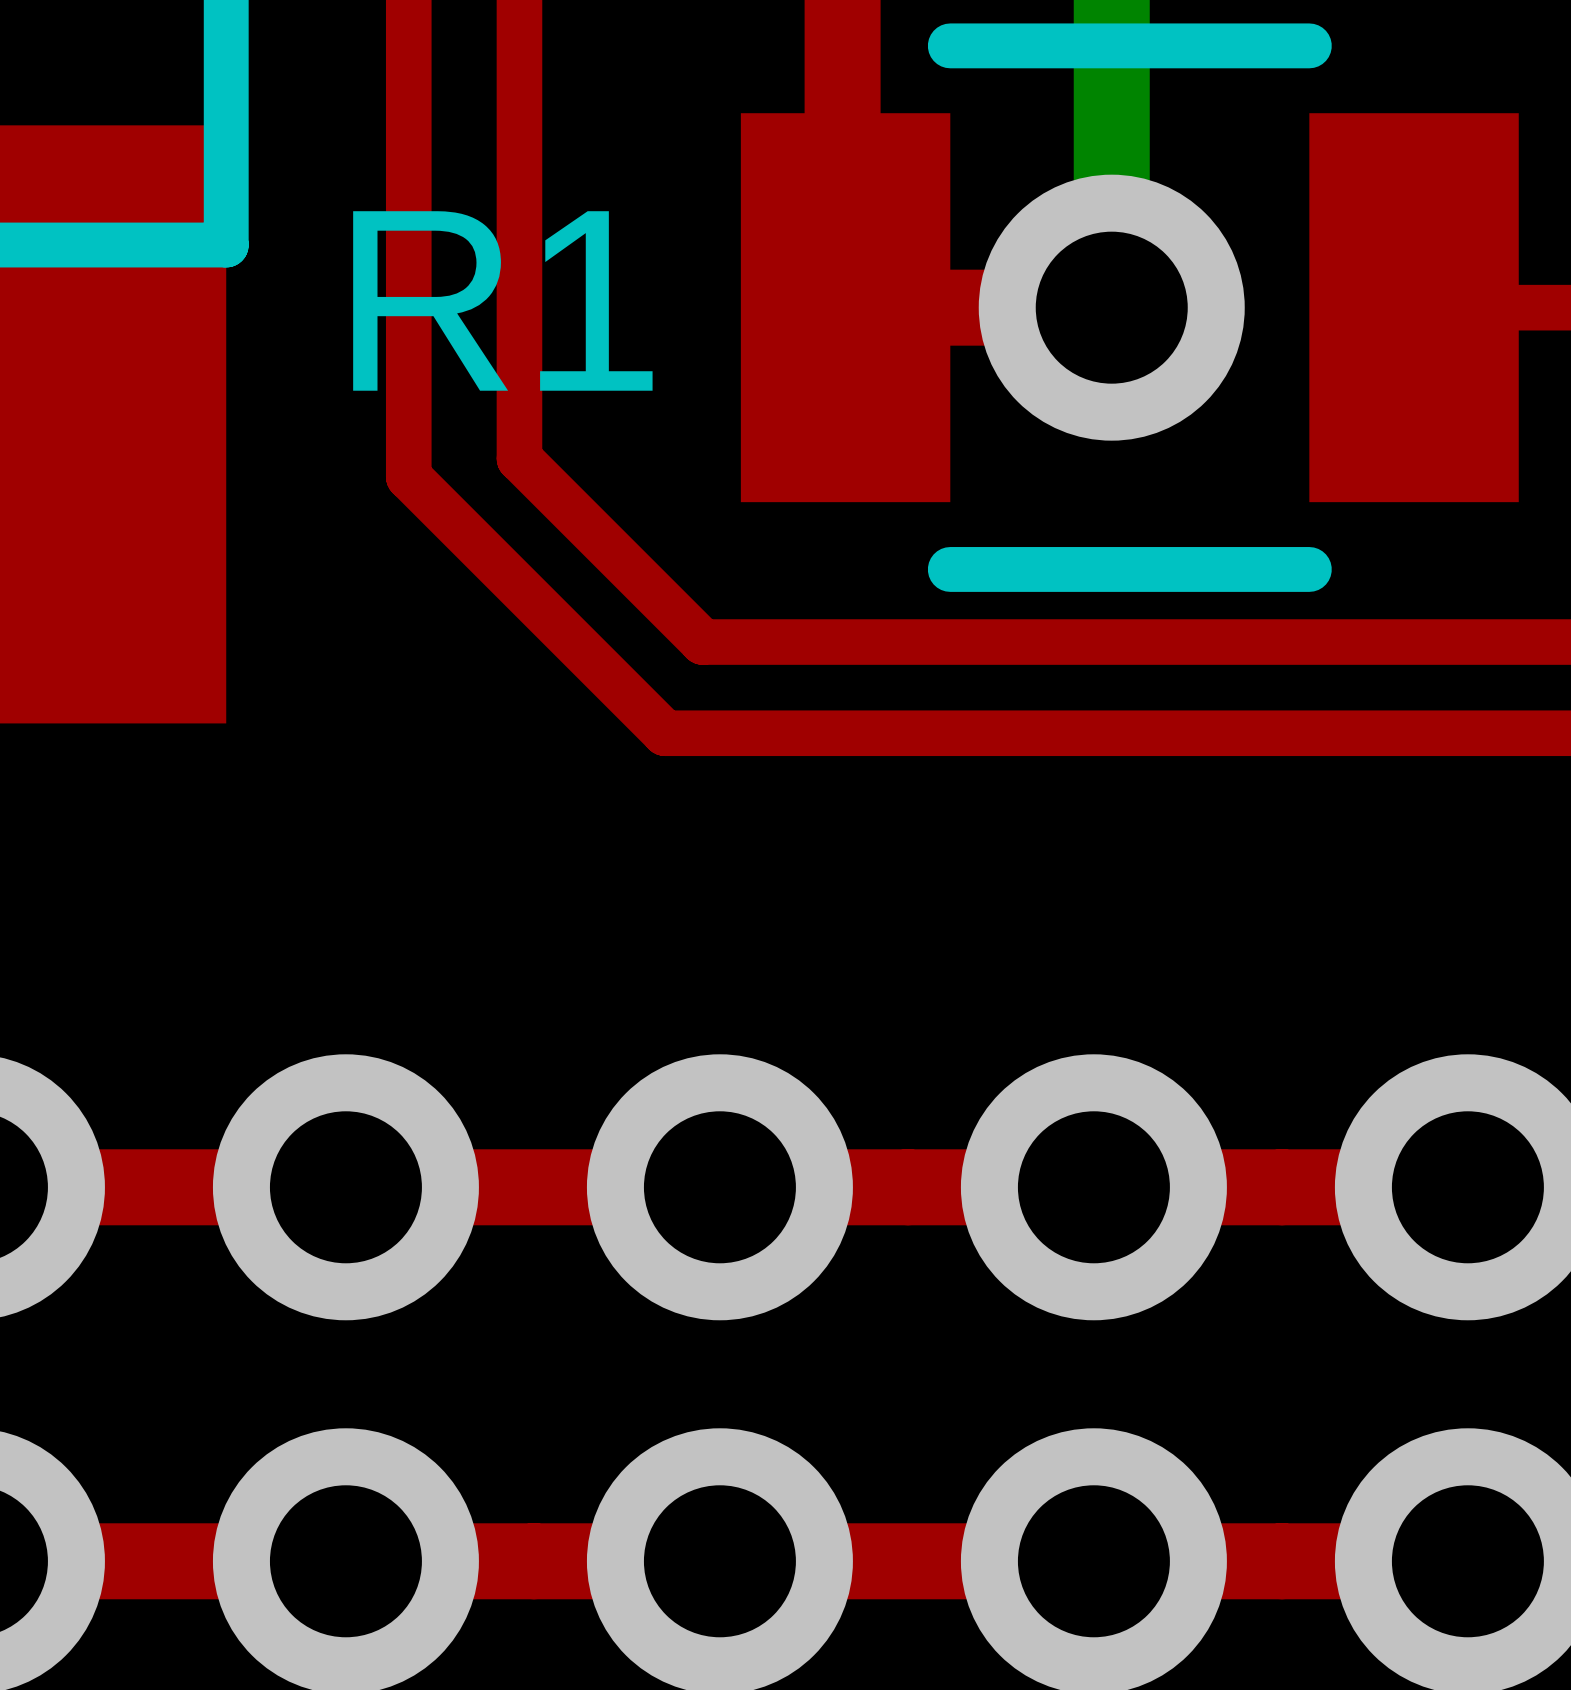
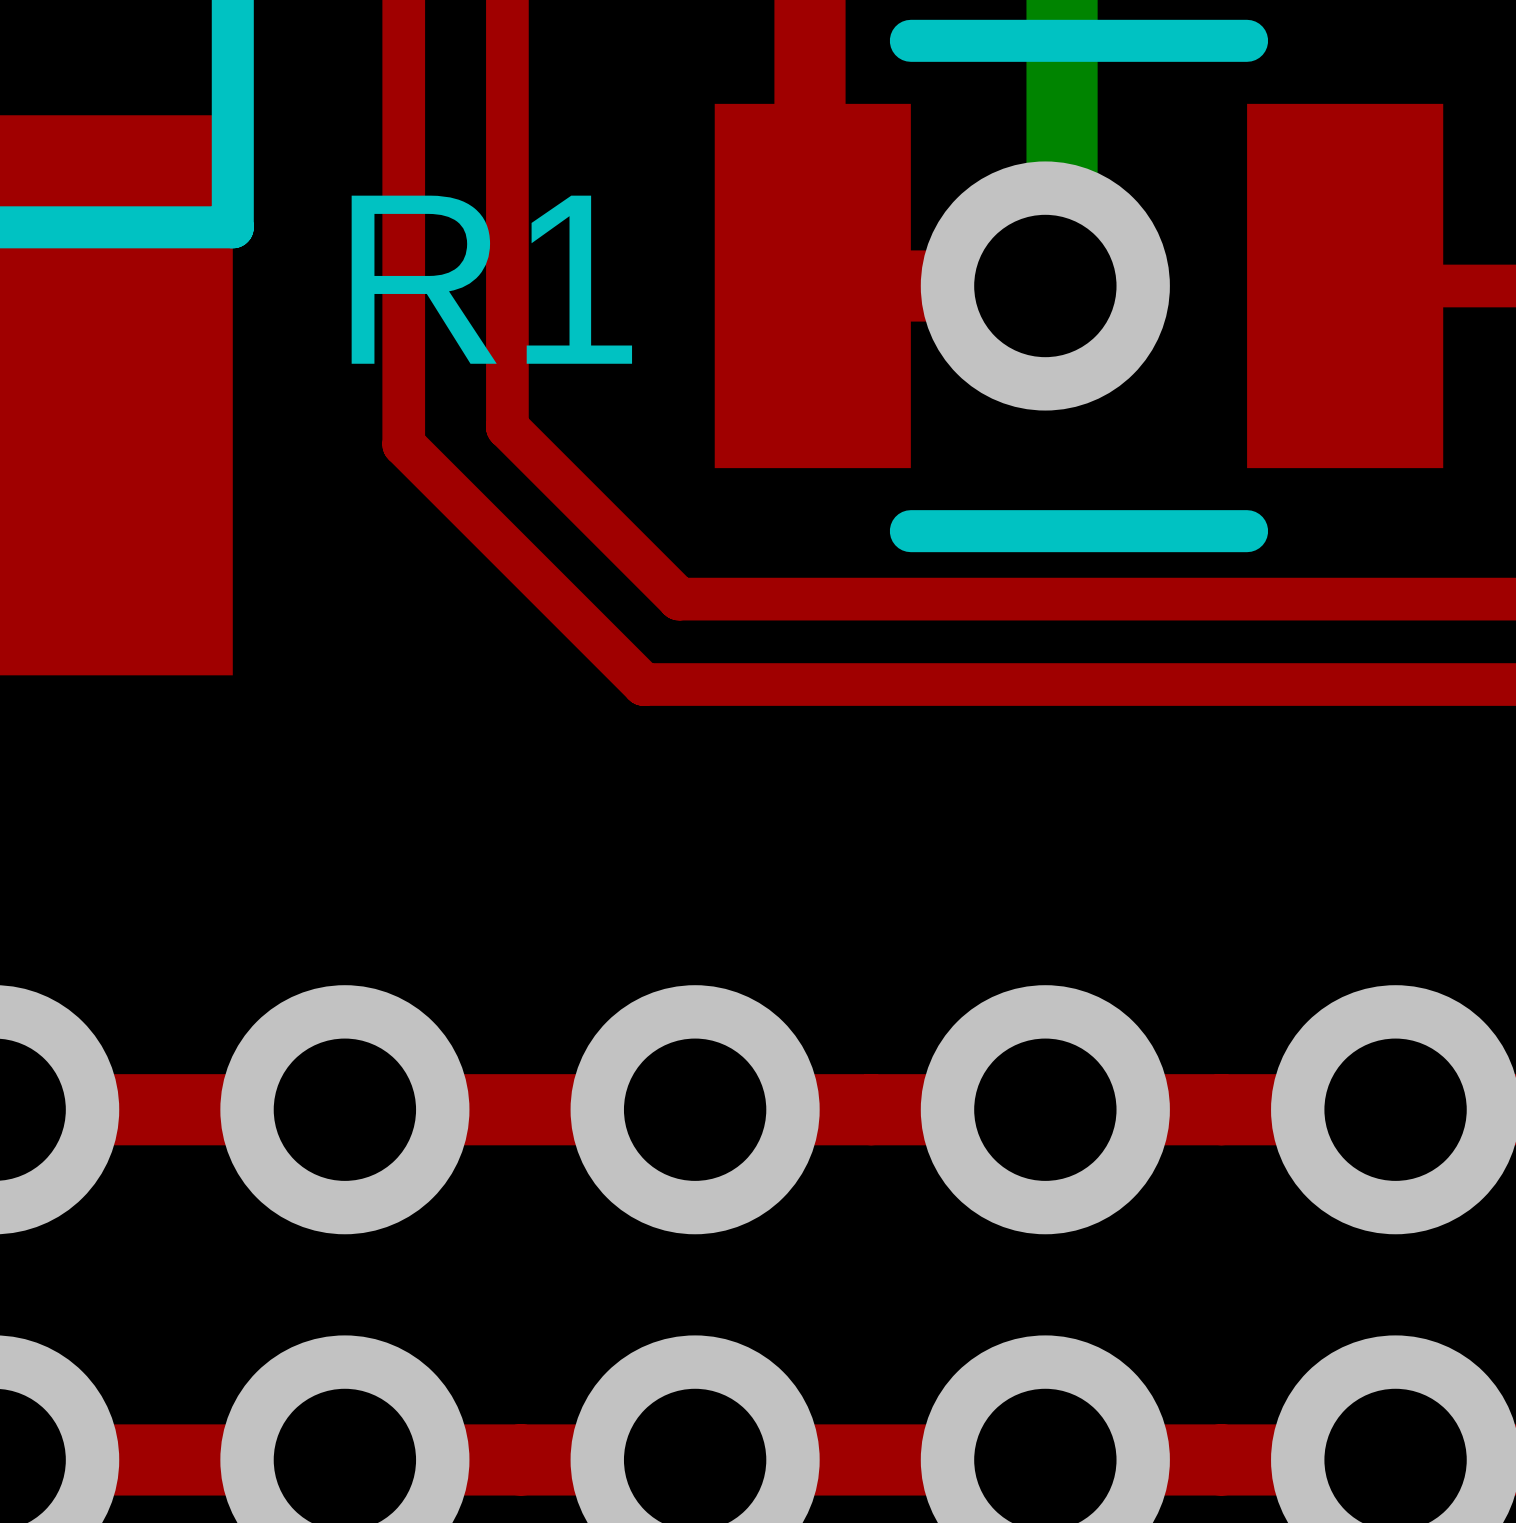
via position: (1111, 307) -> (1045, 285)

